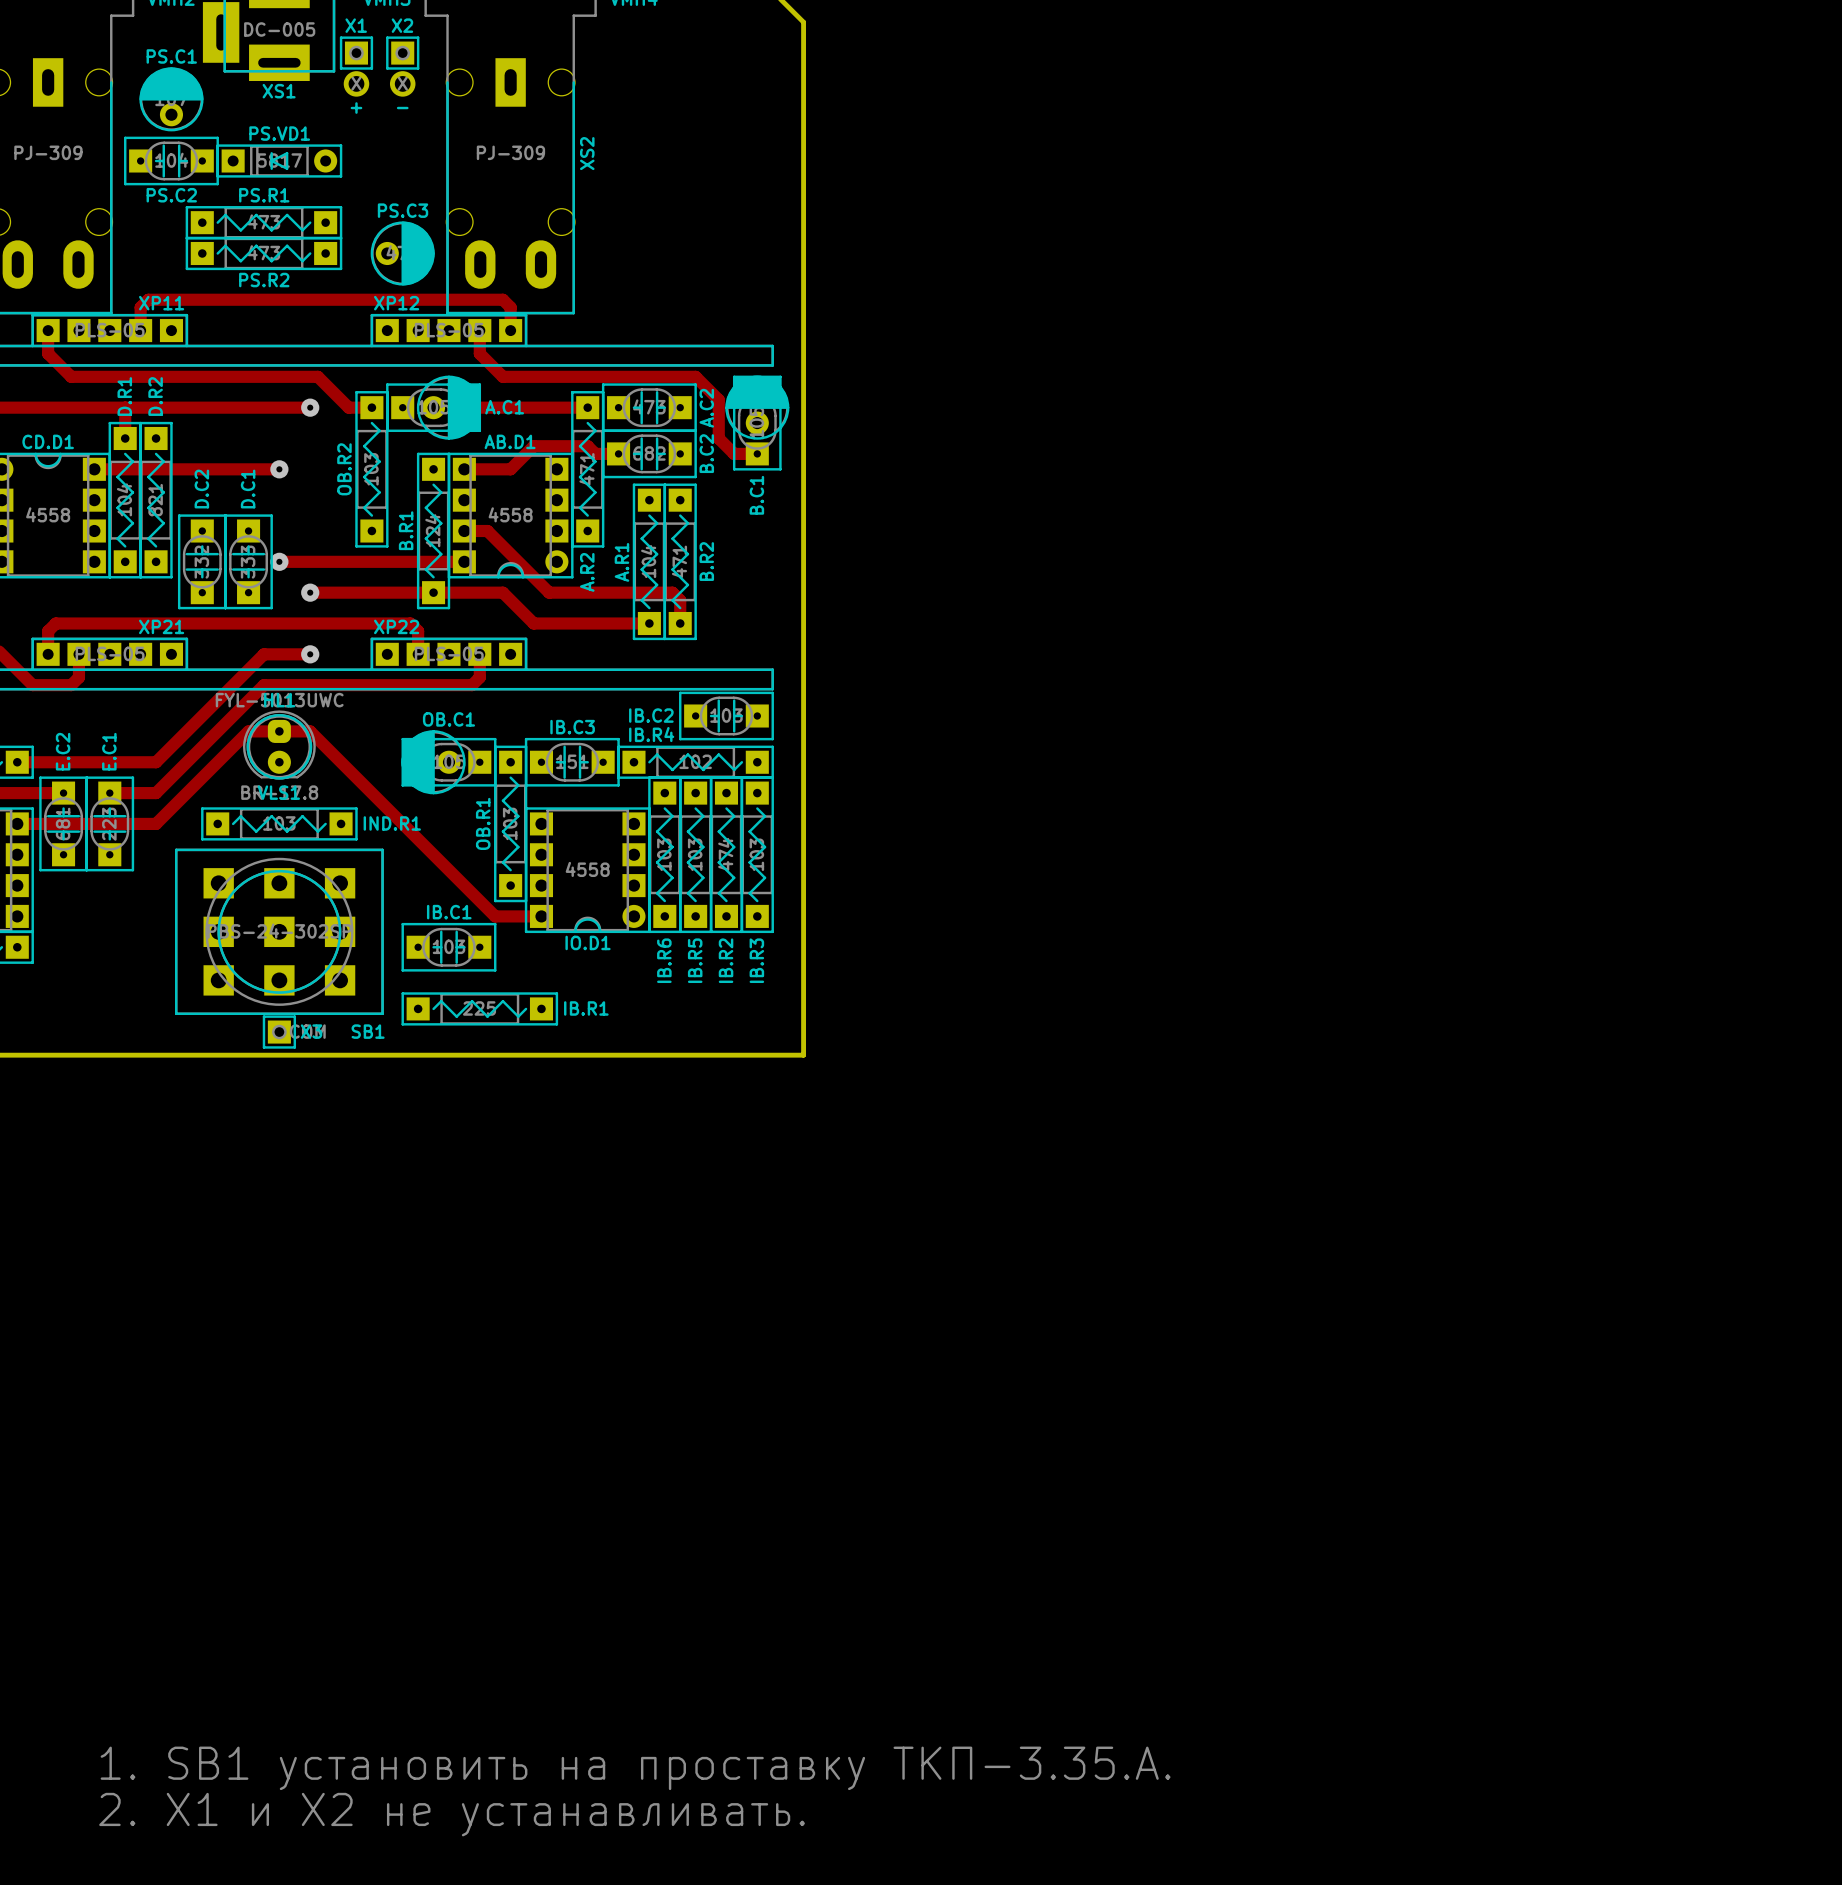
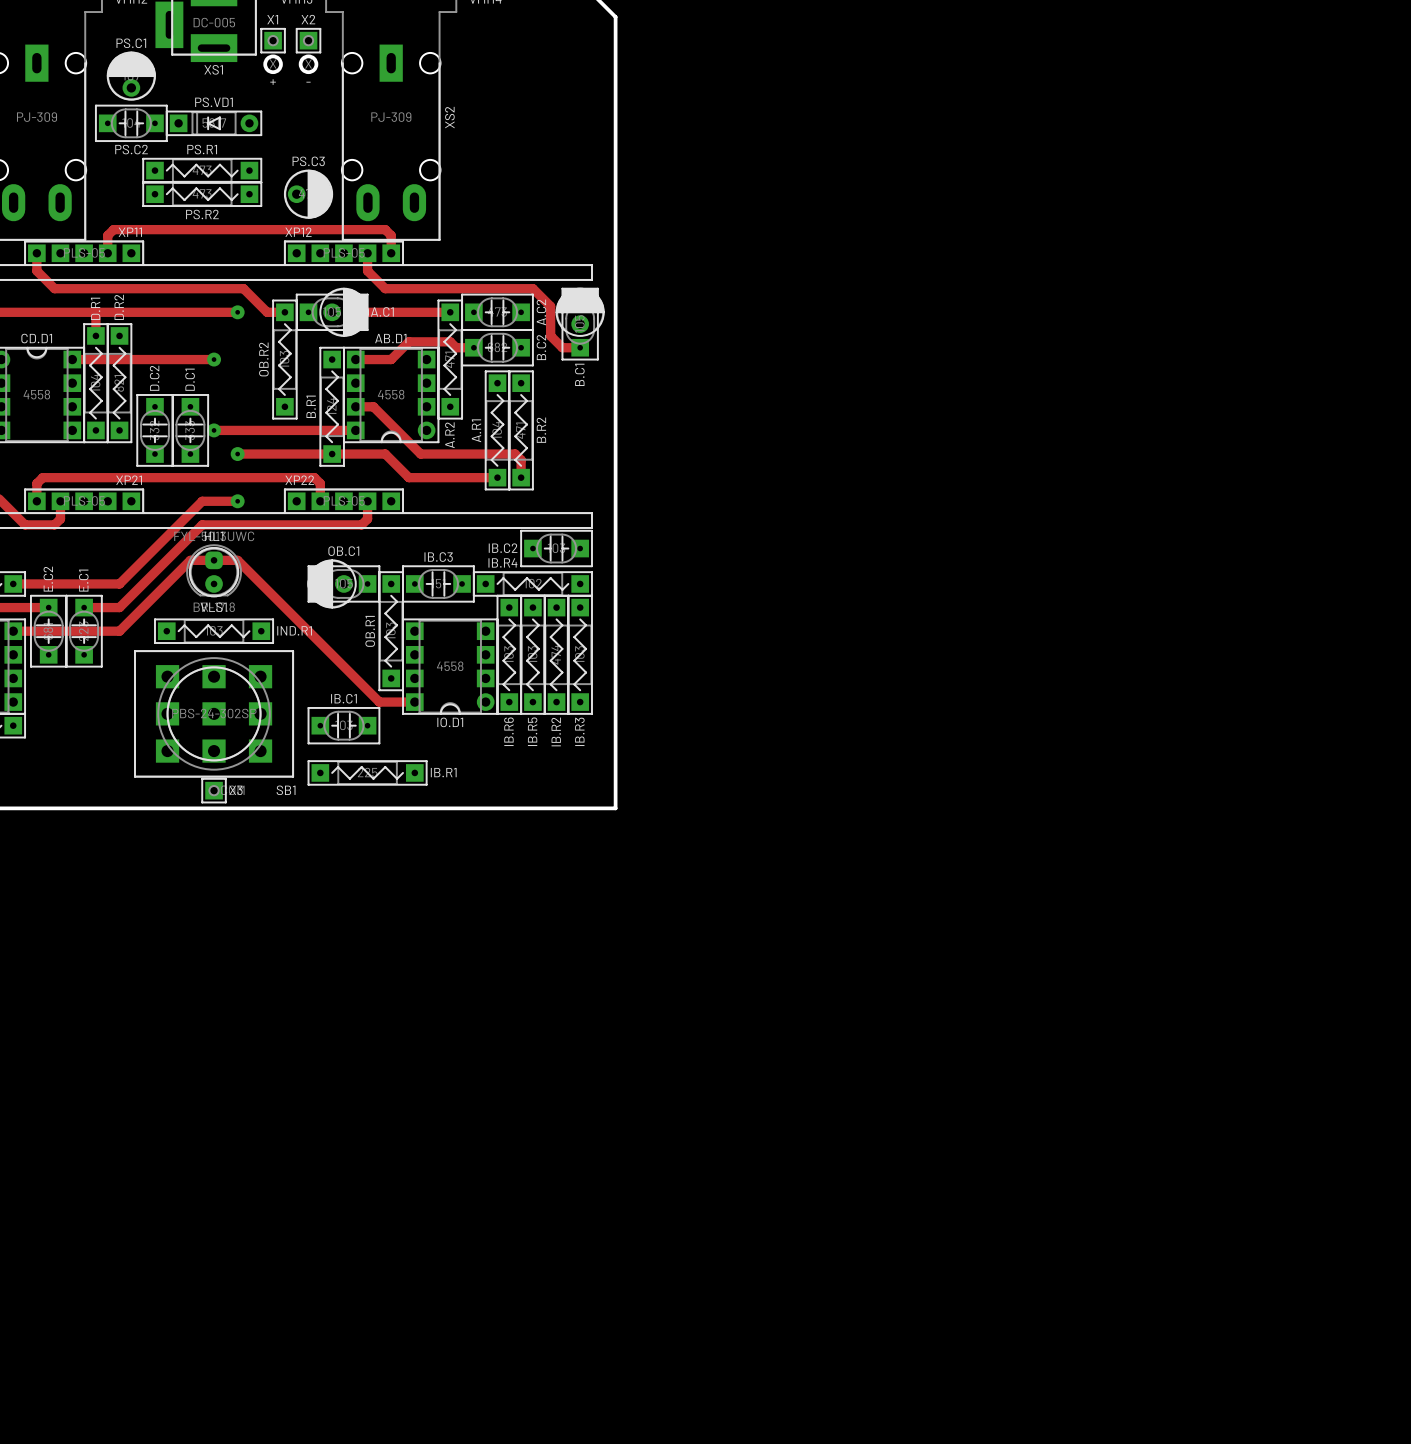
text: 1. SB1 установить на проставку ТКП-3.35.A. (635, 1768) -> none
text: 2. X1 и X2 не устанавливать. (452, 1814) -> none

